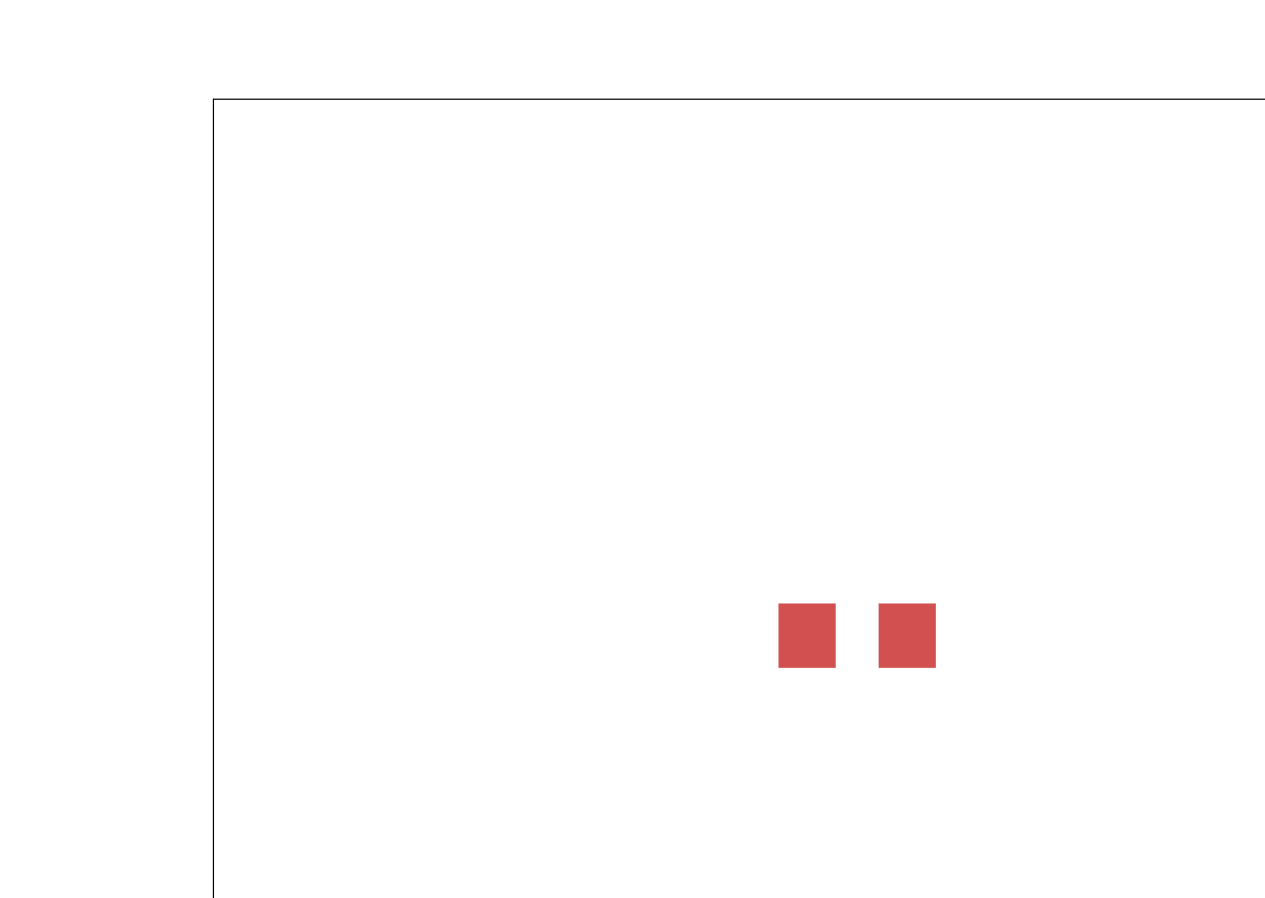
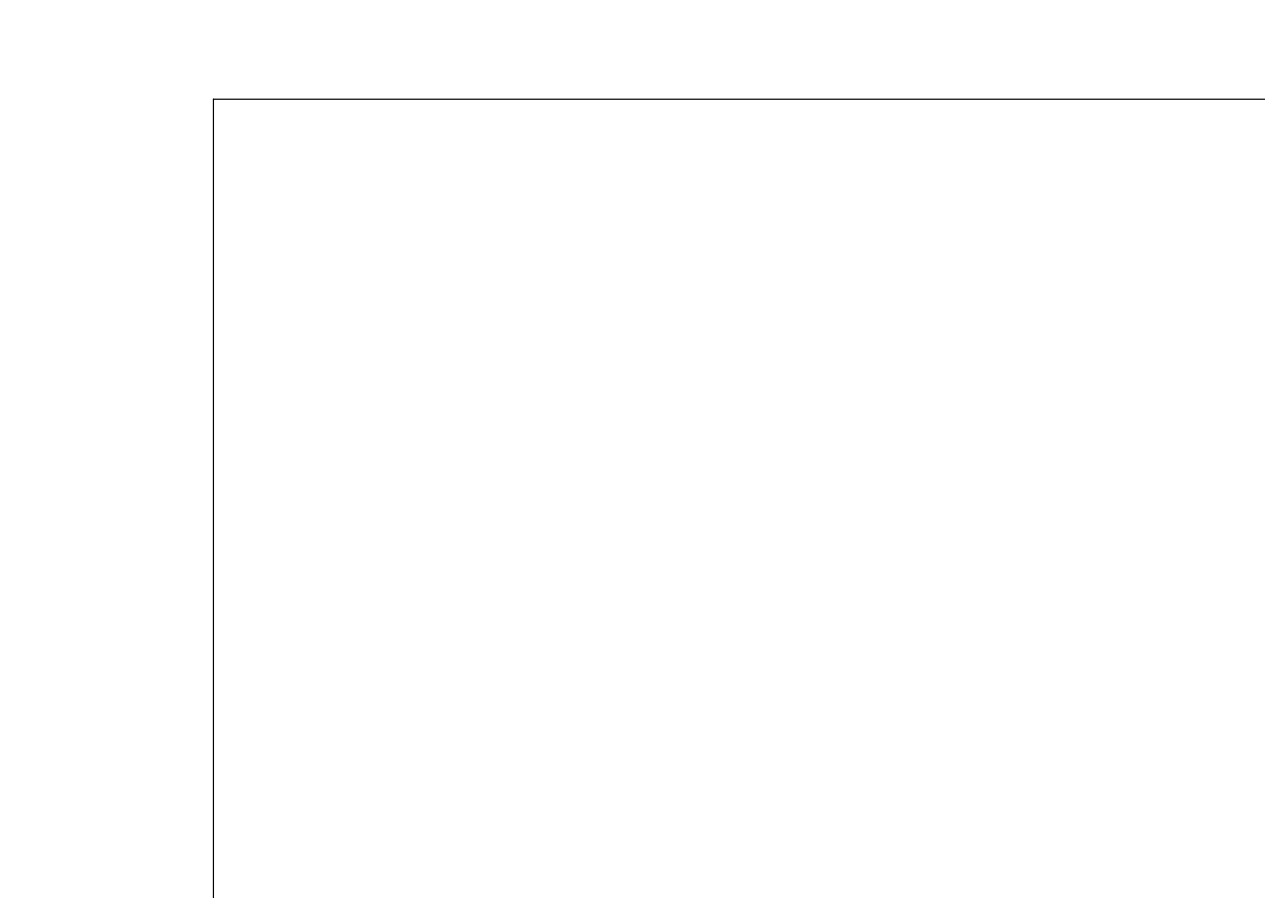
part: (857, 635) -> none

